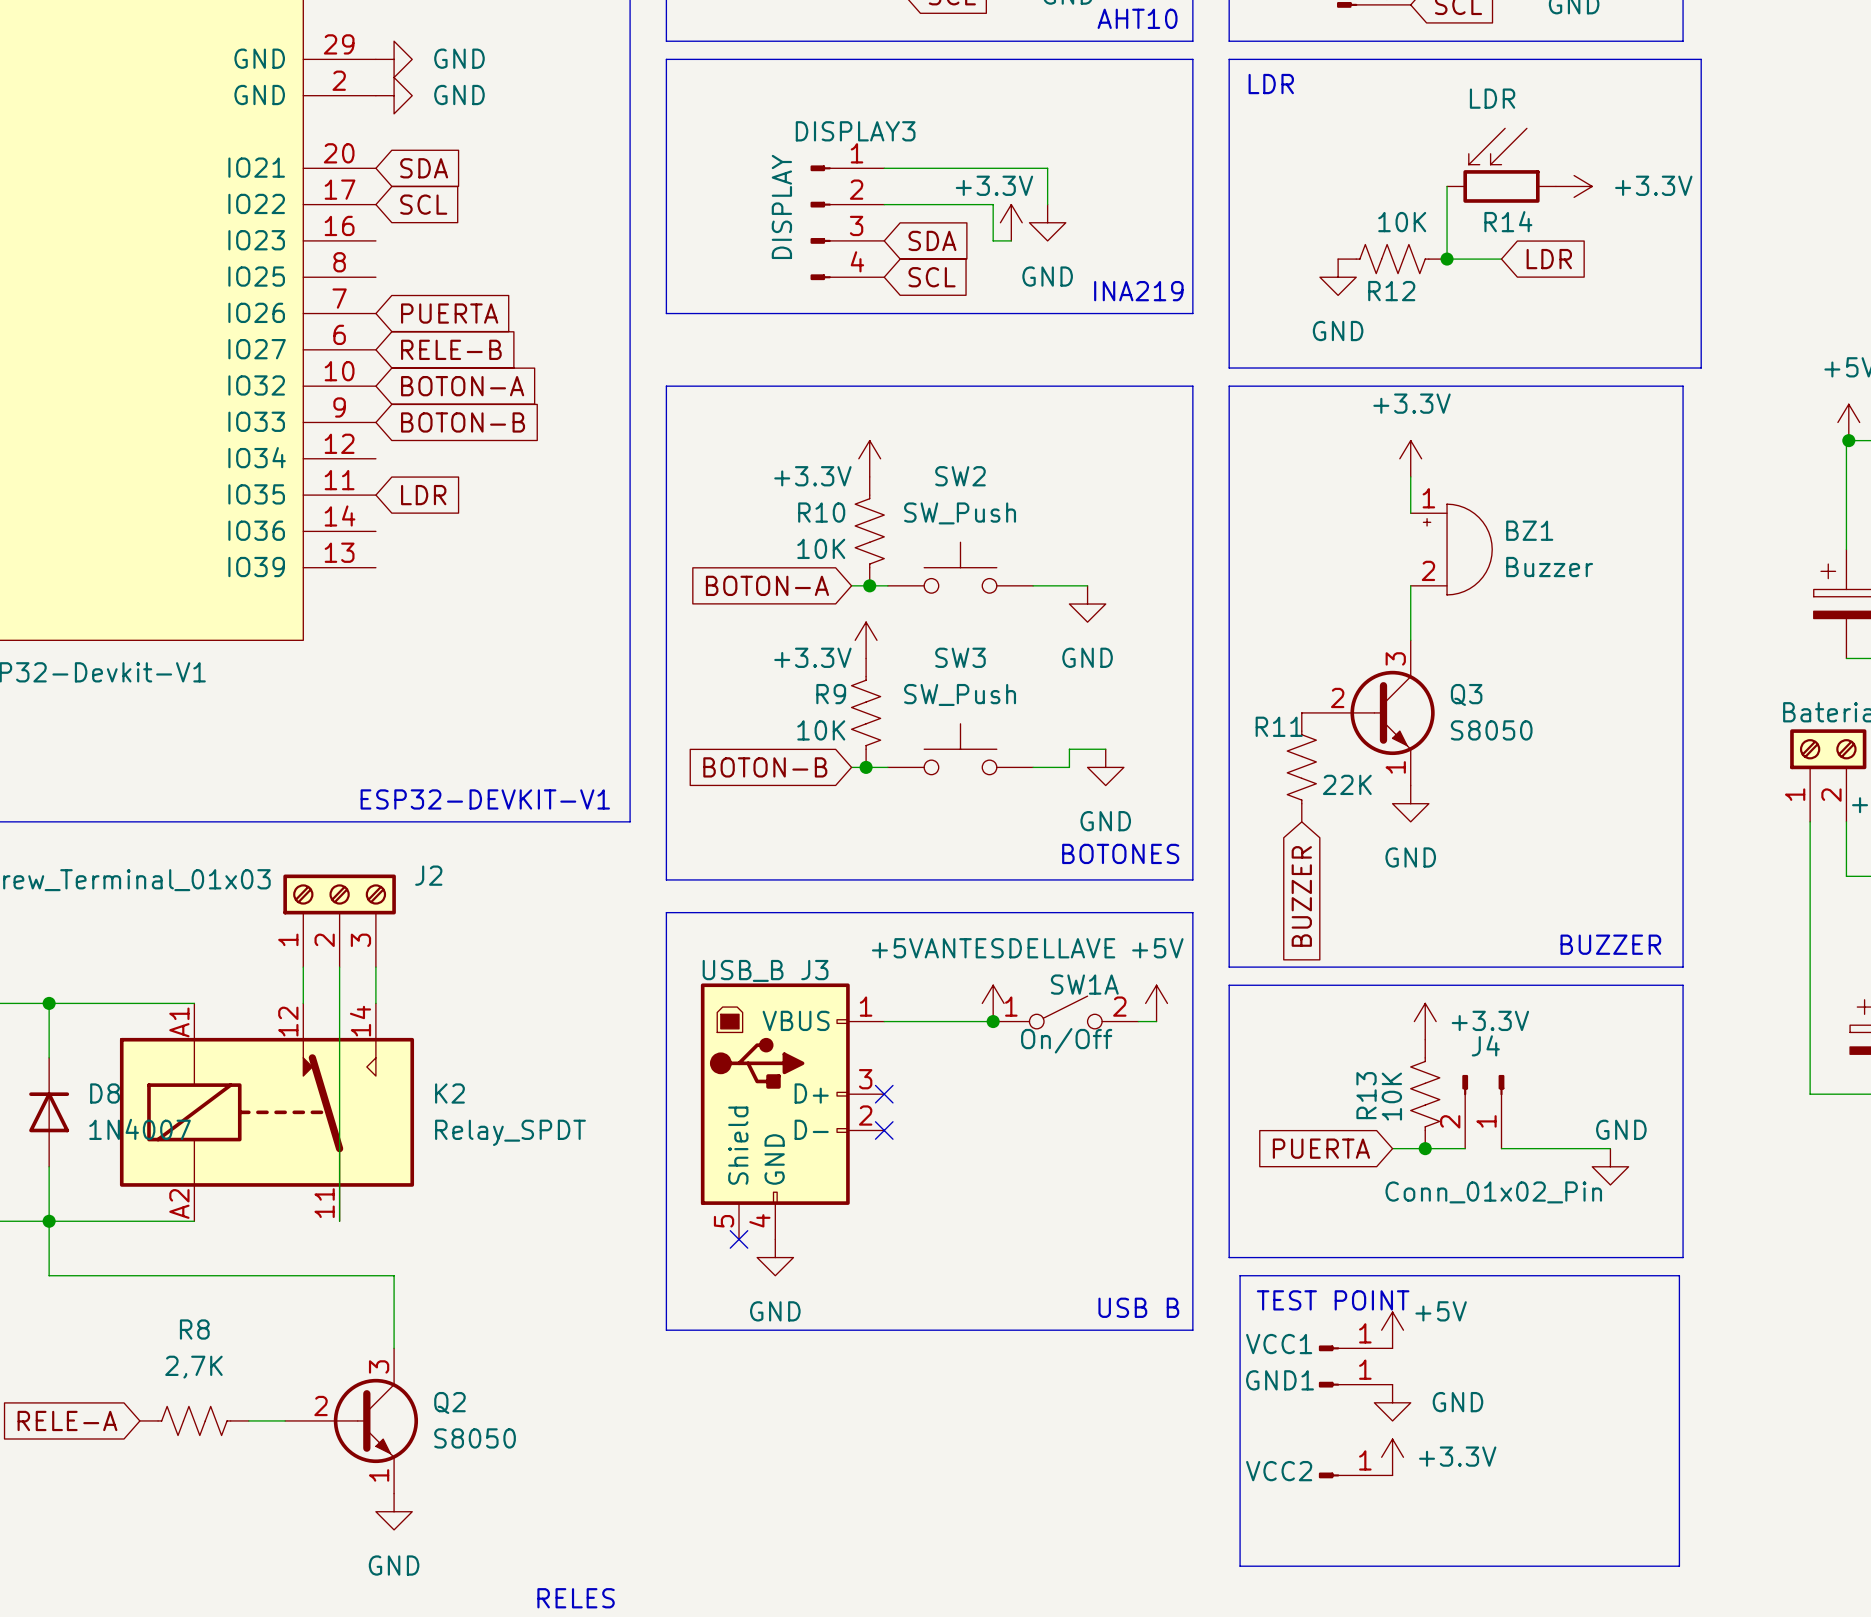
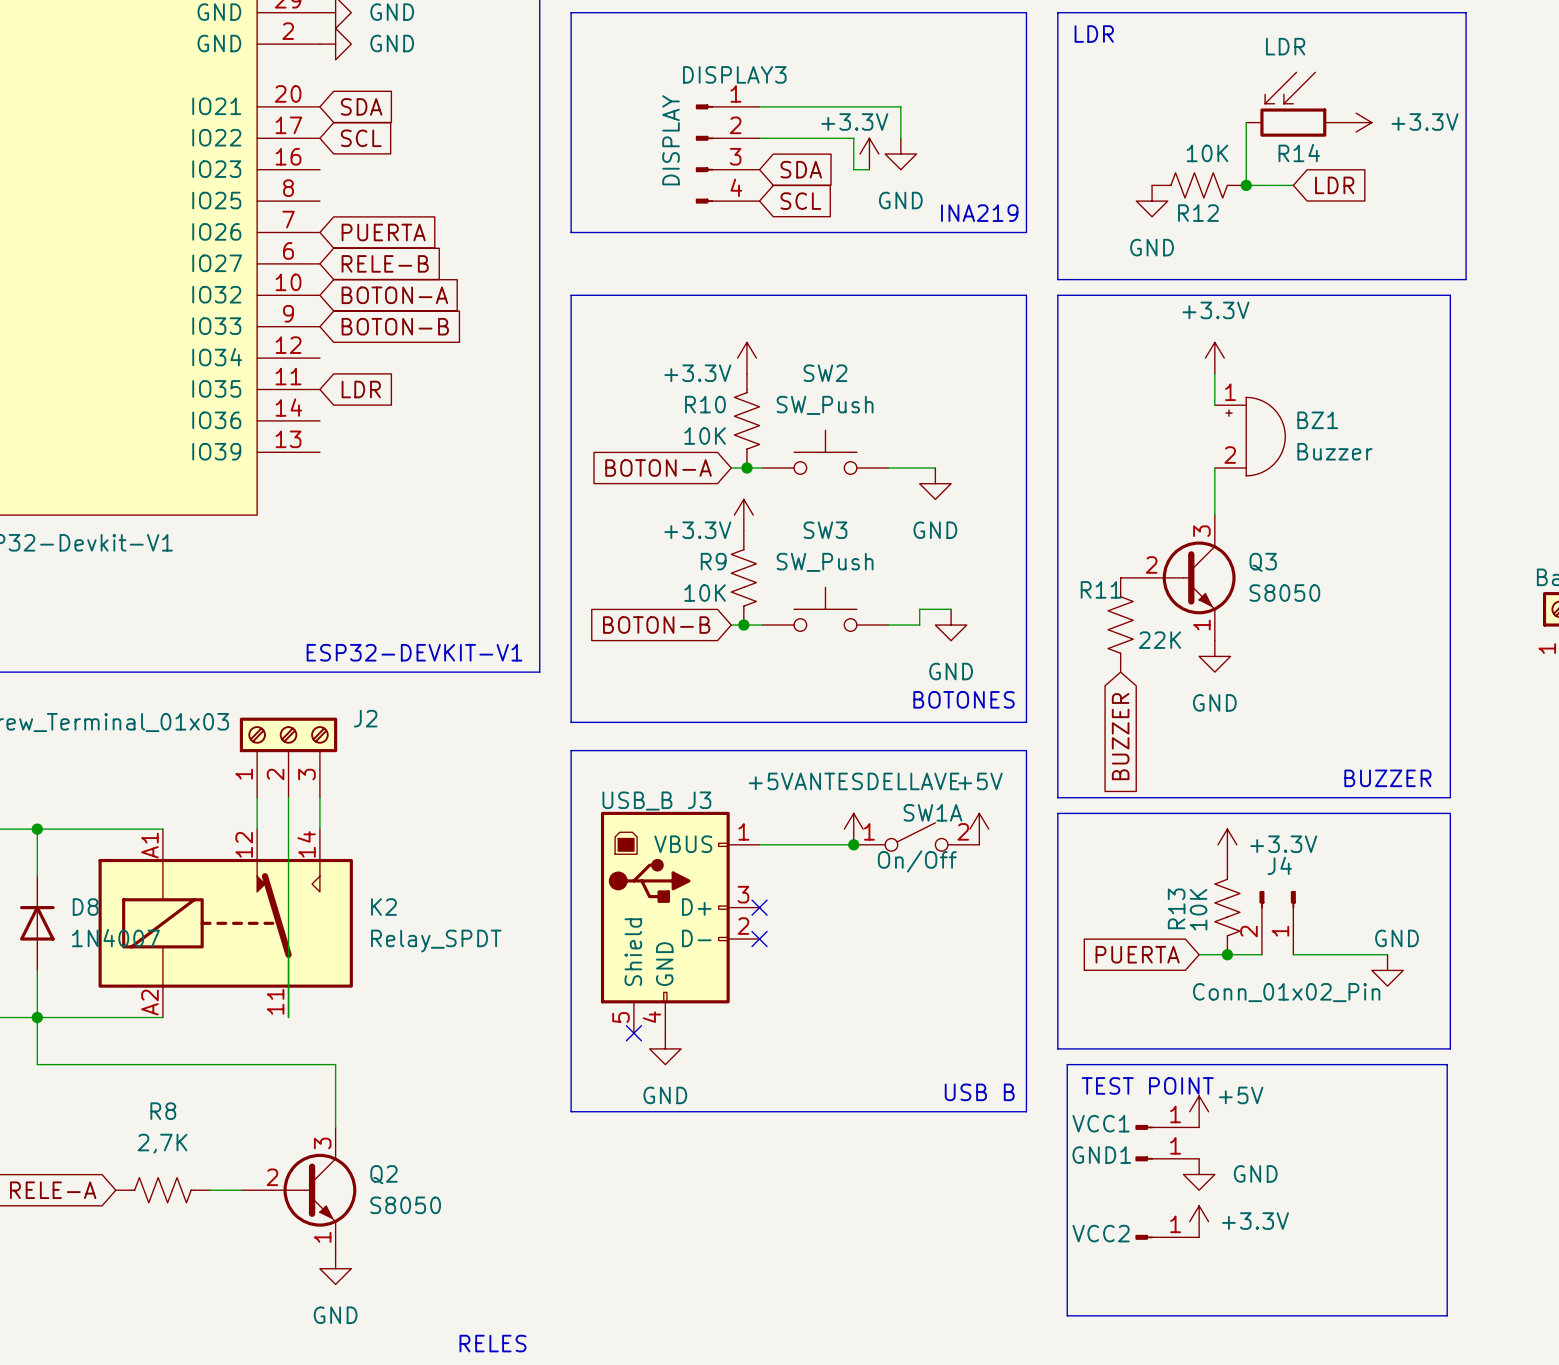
power symbol position: +5V (1156, 1003) -> +5V (979, 829)
wire: (1138, 1021) (1156, 1021) -> none

